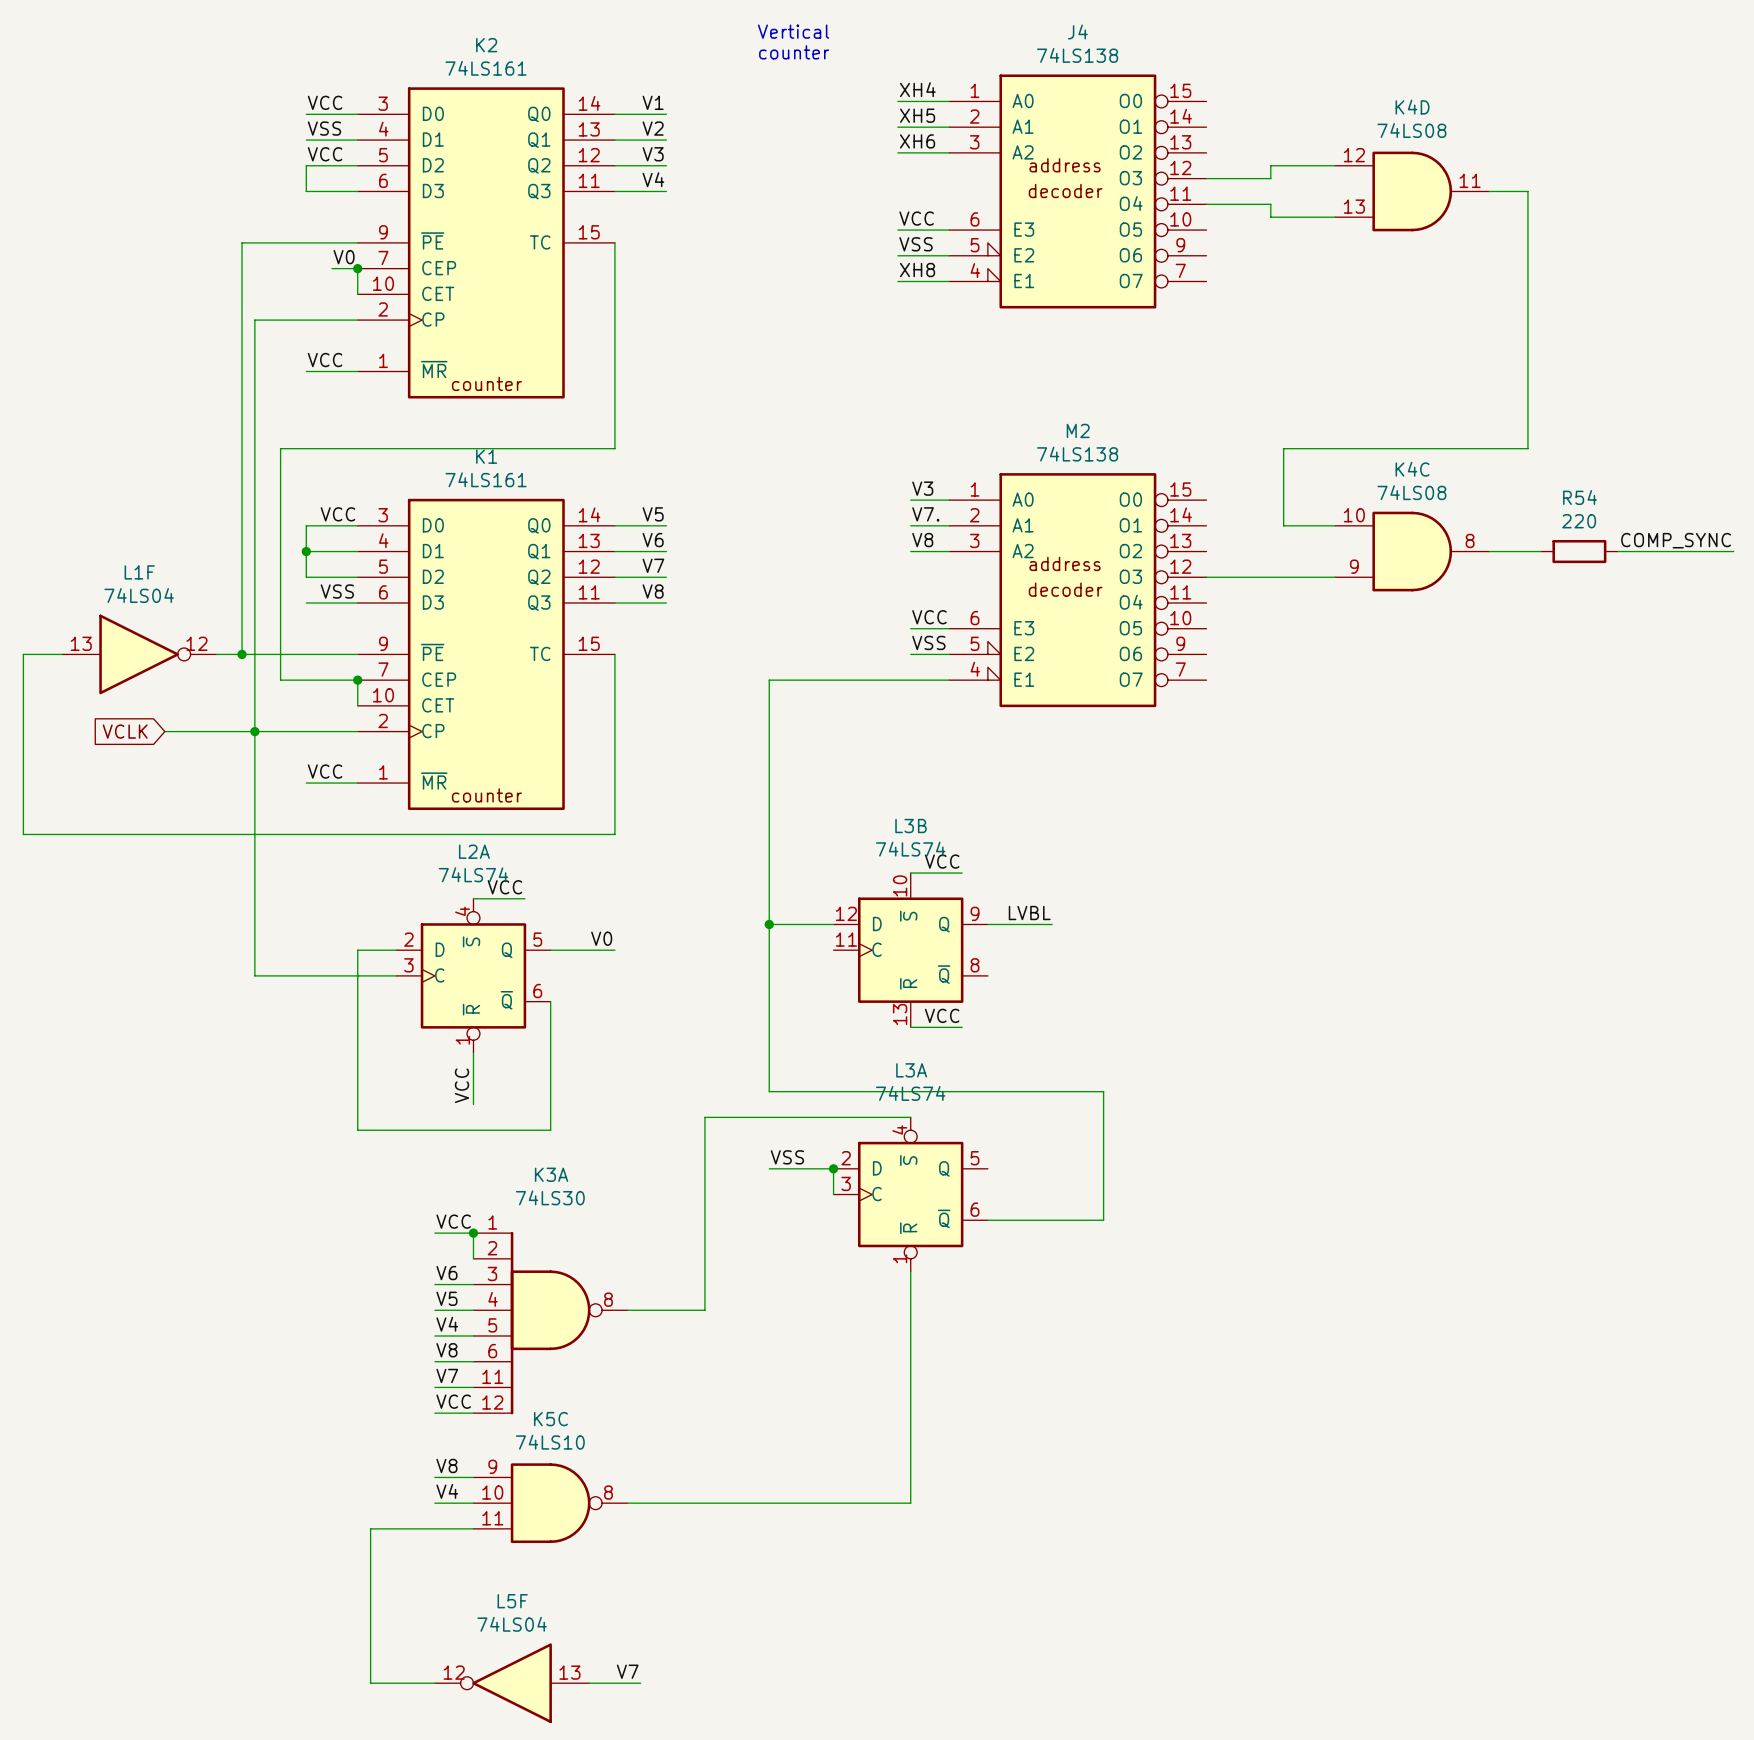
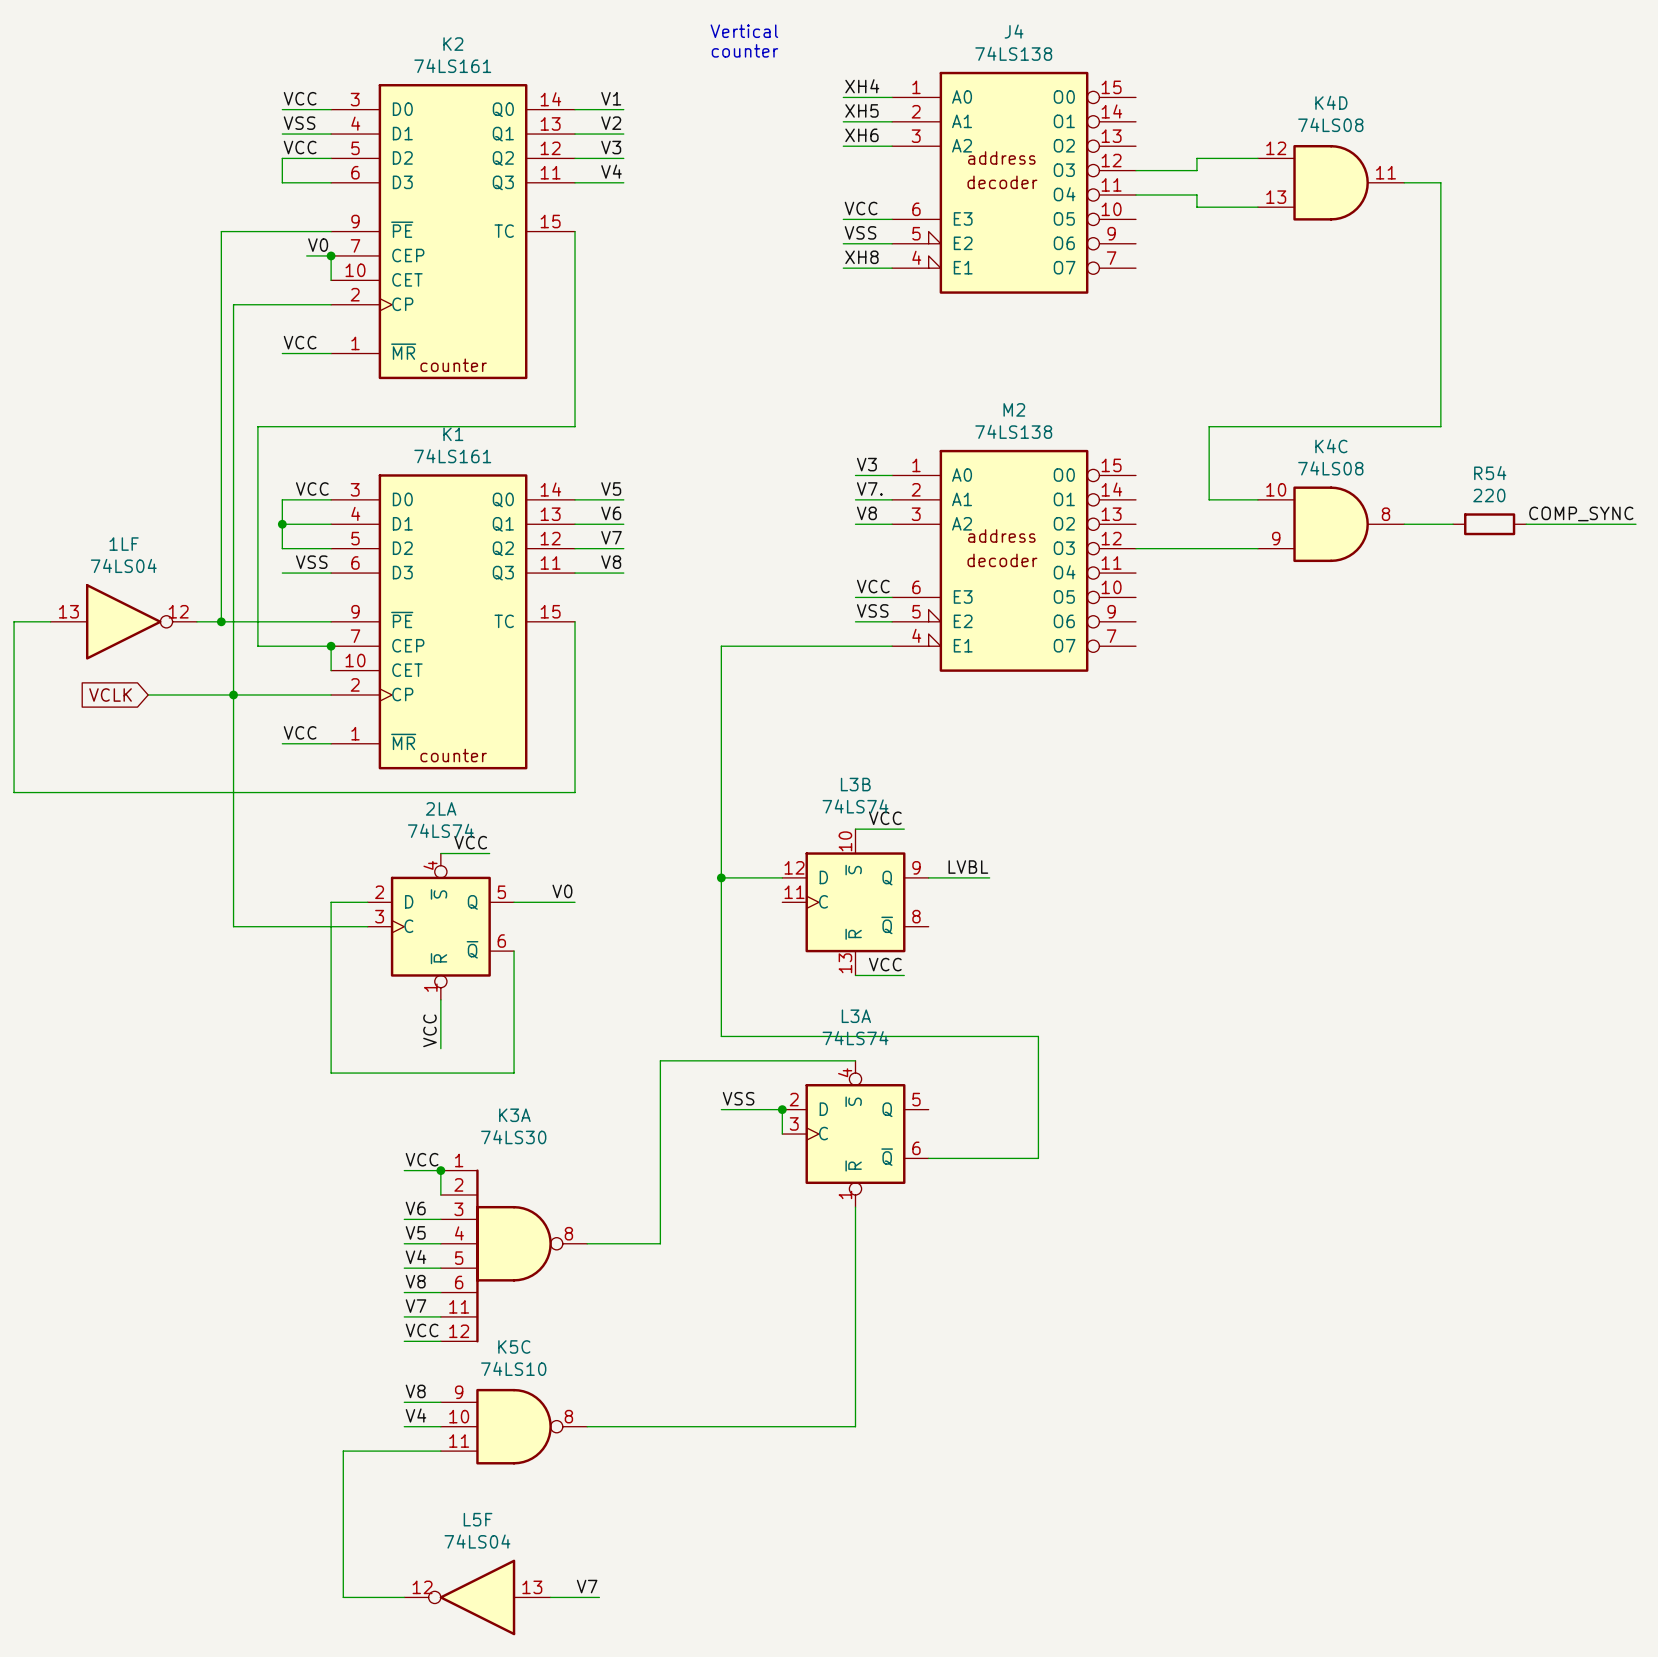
L1F name: L1F (139, 572) -> 1LF (124, 544)
L2A name: L2A (474, 851) -> 2LA (441, 808)

